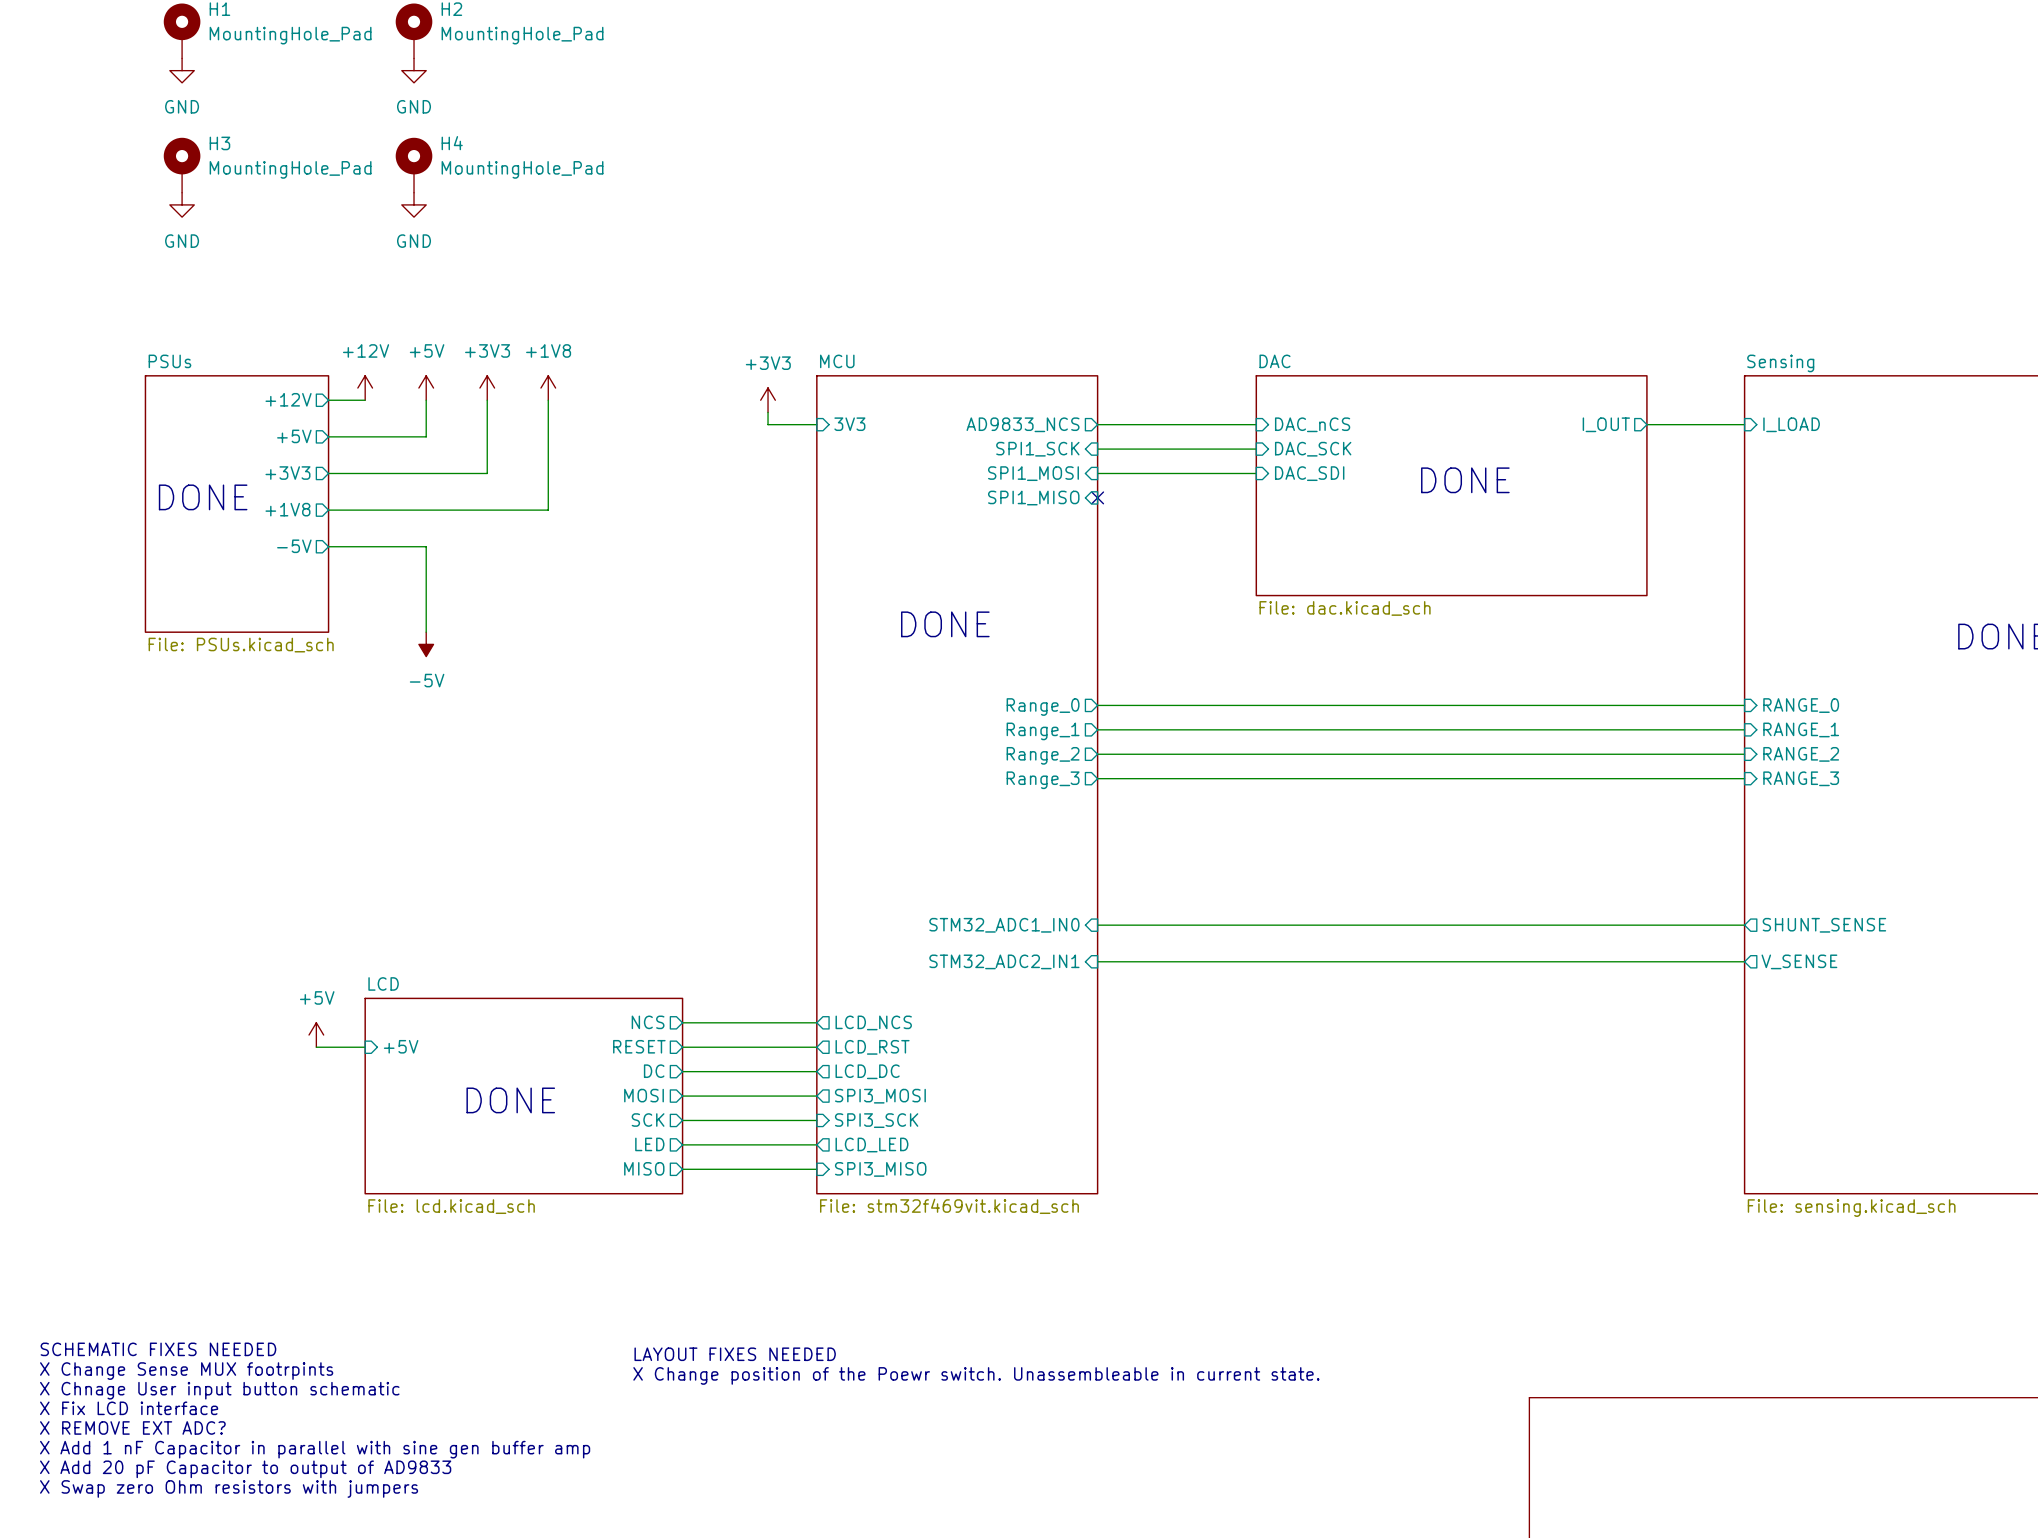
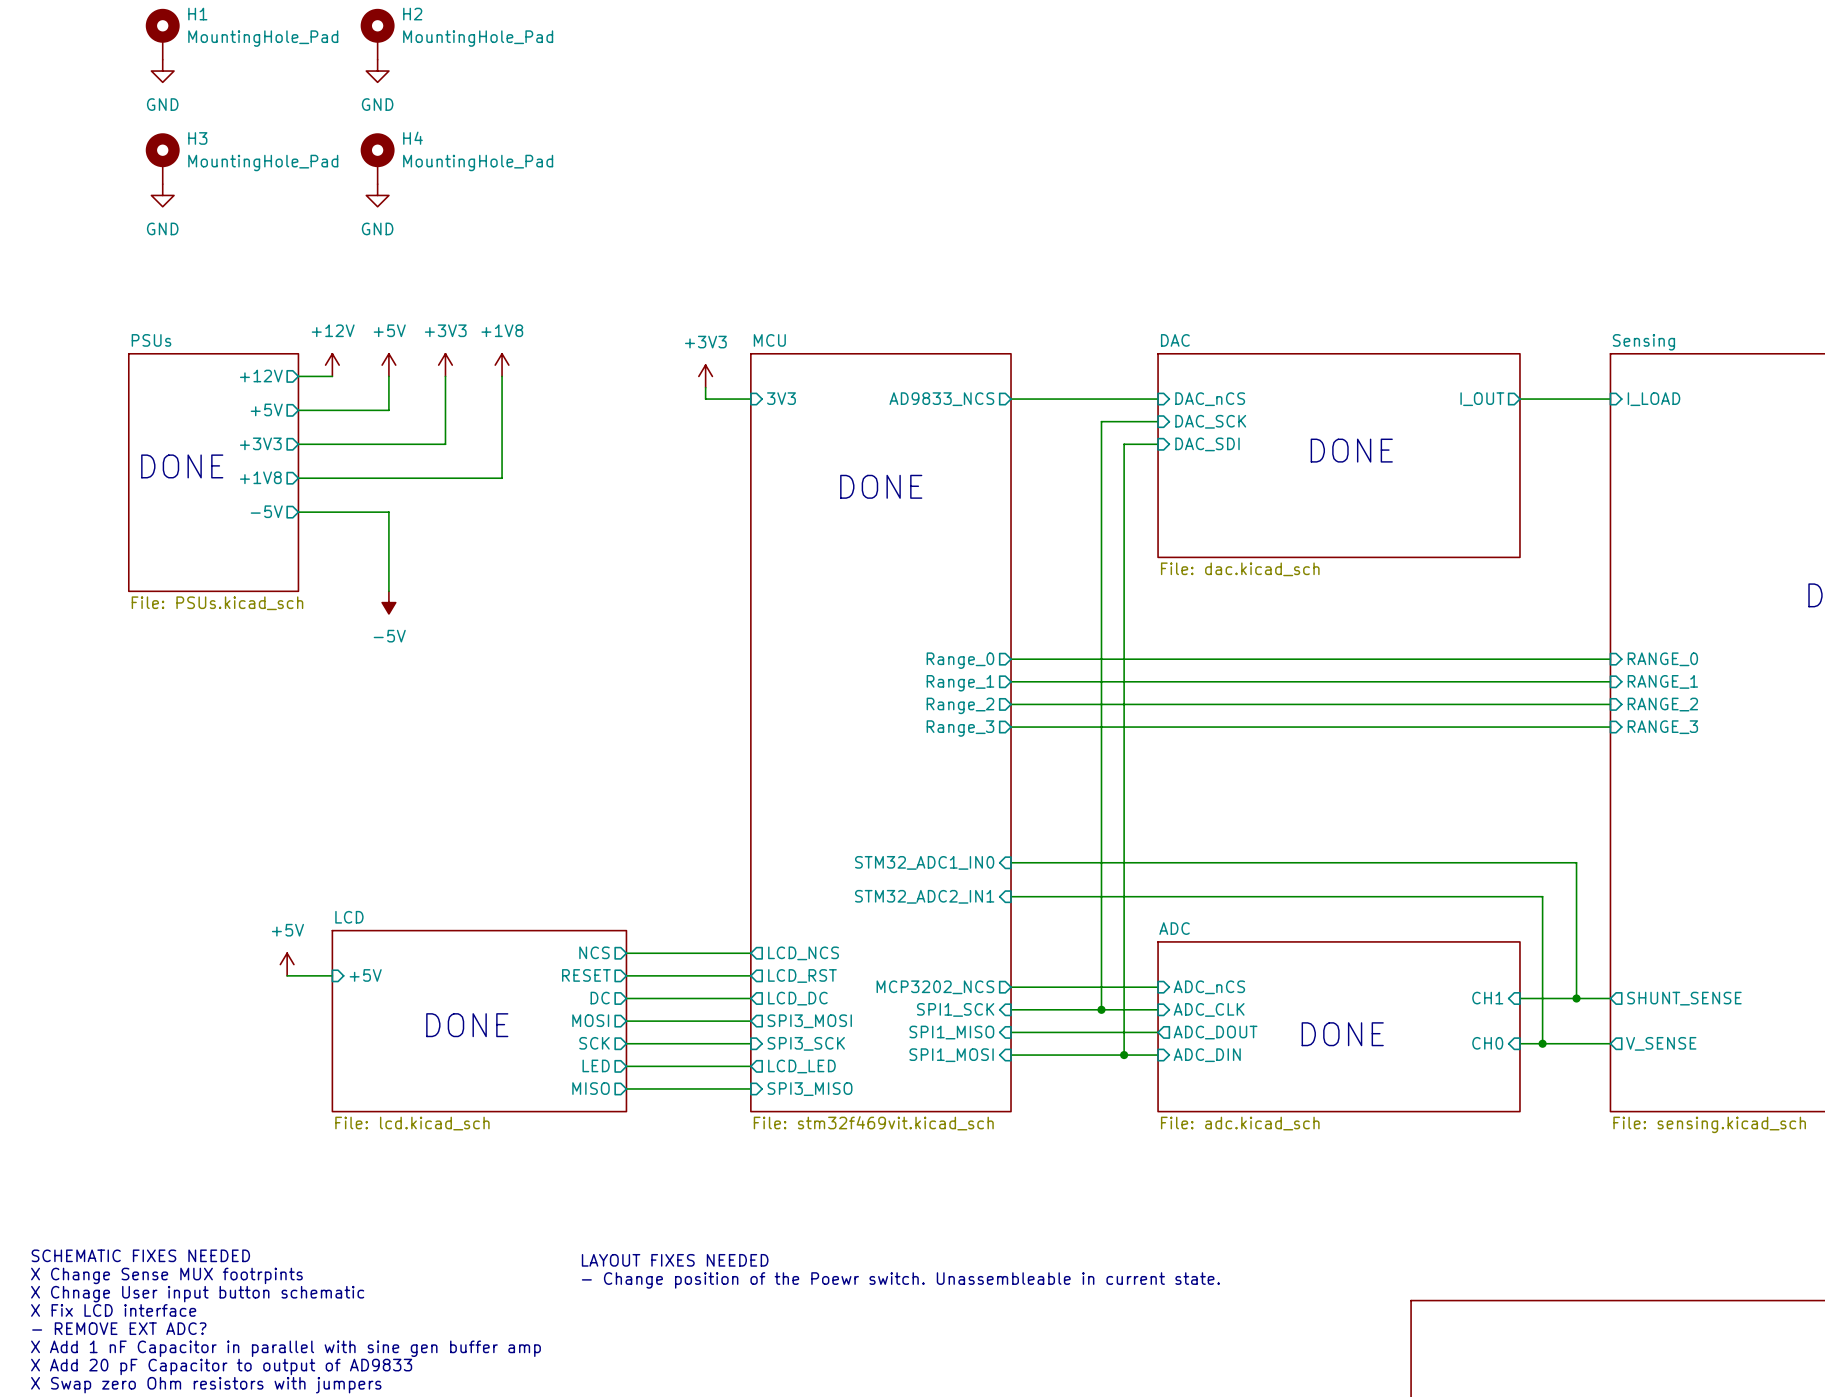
sheet pin: SPI1_SCK (1037, 449) -> none
wire: (1097, 449) (1195, 449) -> (1101, 1009) (1101, 421)
sheet pin: SPI1_MOSI (1033, 473) -> none
wire: (1097, 473) (1219, 473) -> (1124, 1055) (1124, 444)
no-connect mark: (1097, 497) -> none
sheet pin: SPI1_MISO (1033, 498) -> none
text position: DONE (945, 624) -> DONE (881, 486)
wire: (1707, 925) (1744, 925) -> (1576, 862) (1576, 998)
sheet pin position: SHUNT_SENSE (1824, 925) -> SHUNT_SENSE (1684, 998)
wire: (1671, 961) (1744, 961) -> (1542, 896) (1542, 1043)
sheet pin position: V_SENSE (1799, 961) -> V_SENSE (1661, 1043)
sheet pin: none -> MCP3202_NCS (935, 987)
wire: none -> (1011, 987) (1158, 987)
sheet pin: none -> ADC_nCS (1209, 987)
sheet pin: none -> CH1 (1487, 998)
wire: none -> (1519, 998) (1610, 998)
junction: none -> (1576, 998)
sheet pin: none -> SPI1_SCK (955, 1009)
wire: none -> (1011, 1009) (1158, 1009)
junction: none -> (1101, 1009)
sheet pin: none -> ADC_CLK (1209, 1009)
sheet ADC: none -> File: adc.kicad_sch (1339, 1026)
sheet pin: none -> SPI1_MISO (951, 1032)
wire: none -> (1011, 1032) (1158, 1032)
sheet pin: none -> ADC_DOUT (1215, 1032)
text: none -> DONE (1342, 1034)
sheet pin: none -> CH0 (1487, 1043)
wire: none -> (1519, 1043) (1610, 1043)
junction: none -> (1542, 1043)
sheet pin: none -> SPI1_MOSI (951, 1055)
wire: none -> (1011, 1055) (1158, 1055)
junction: none -> (1124, 1055)
sheet pin: none -> ADC_DIN (1207, 1055)
text: X Change position of the Poewr switch. Unassembleable in current state. (976, 1375) -> - Change position of the Poewr switch. Unassembleable in current state. (900, 1280)
text: X REMOVE EXT ADC? (132, 1427) -> - REMOVE EXT ADC? (119, 1328)

